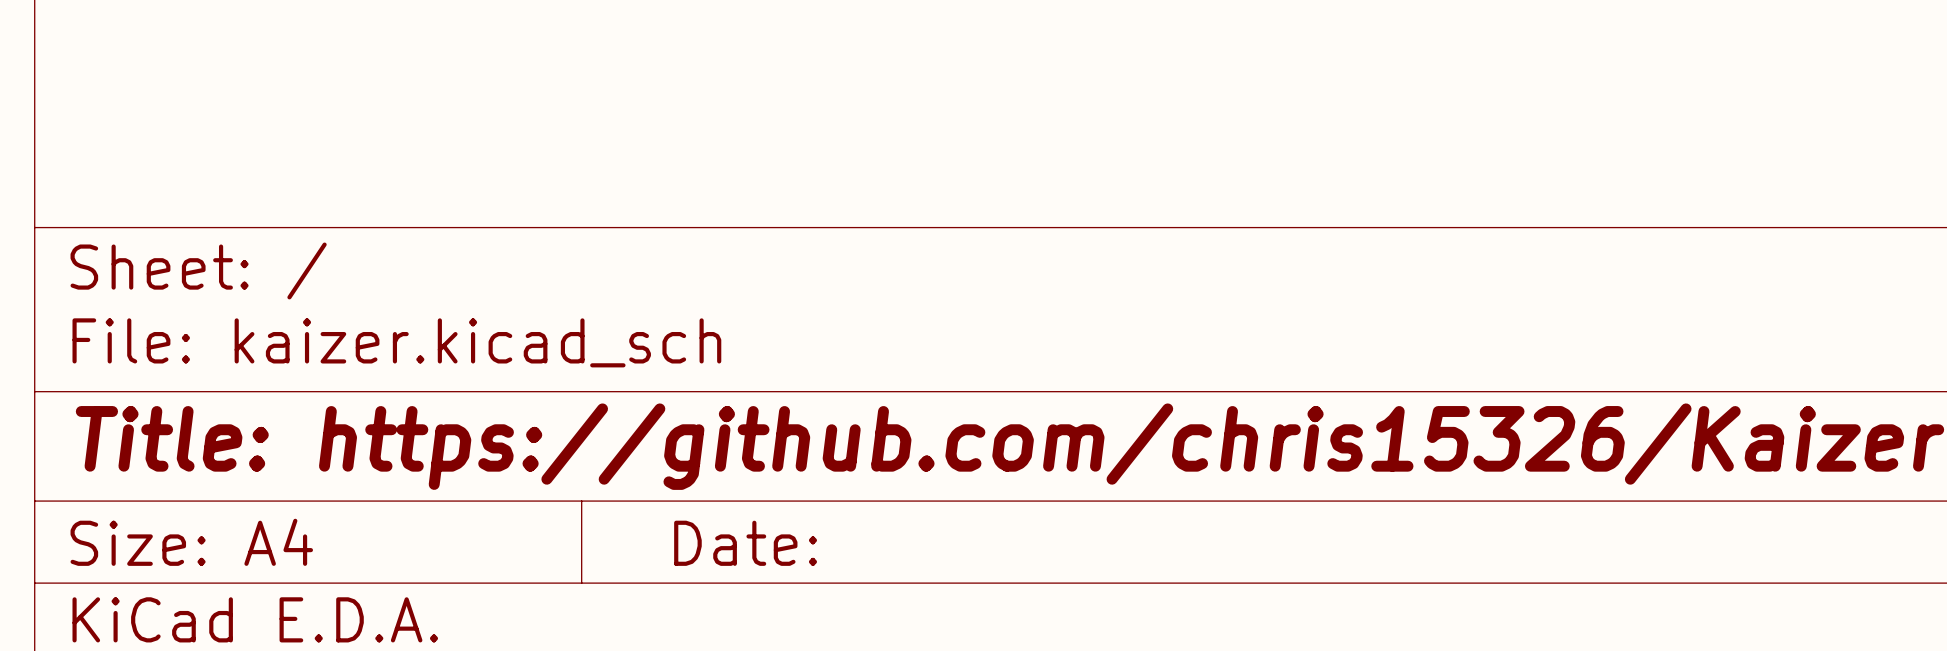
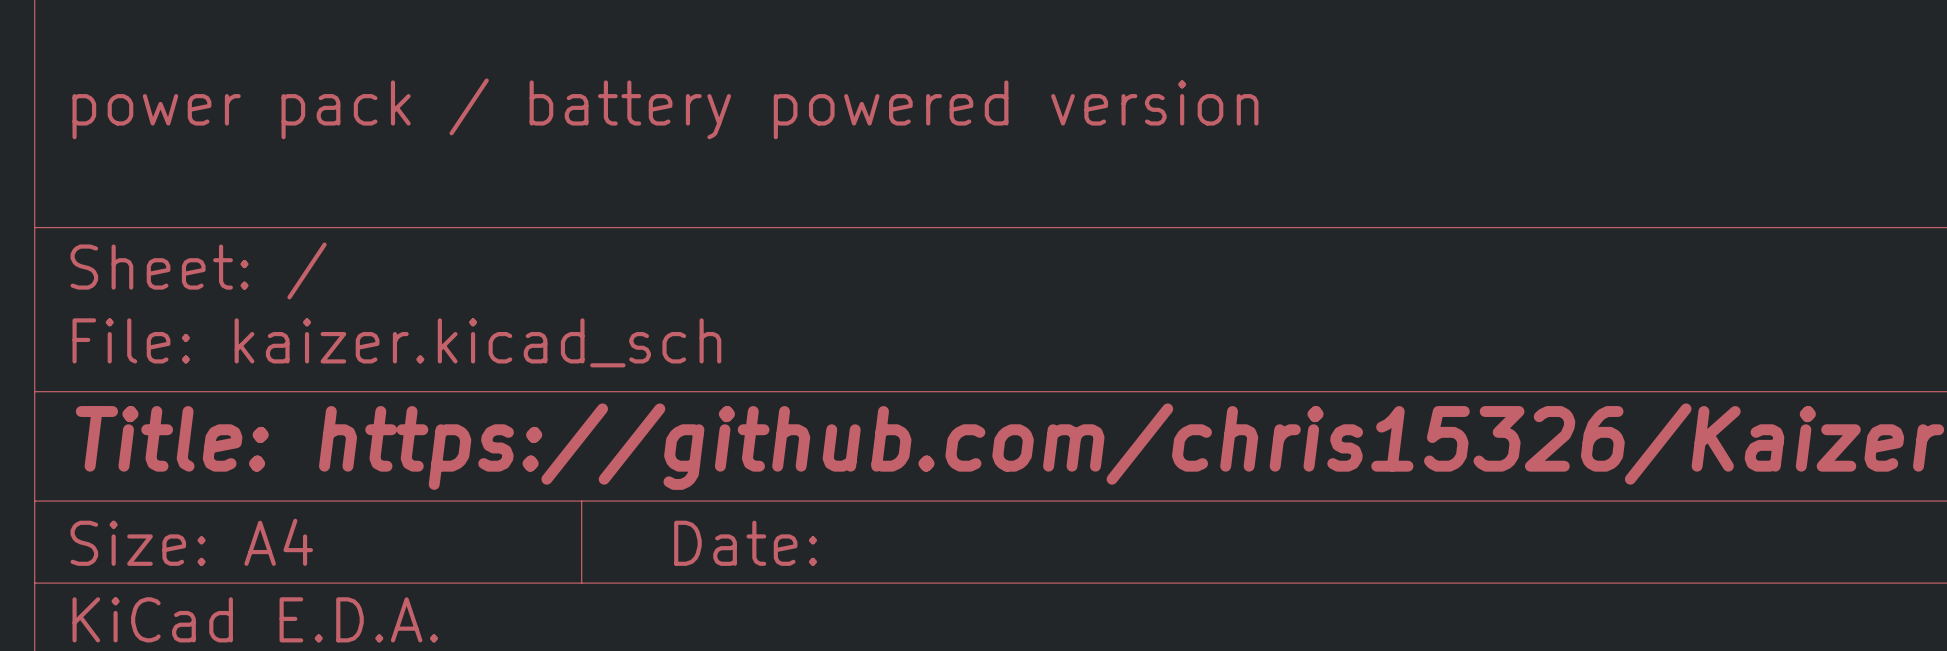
title block: none -> power pack / battery powered version (665, 108)

